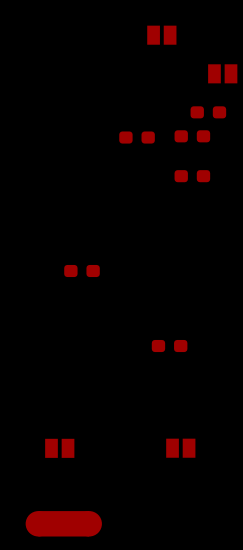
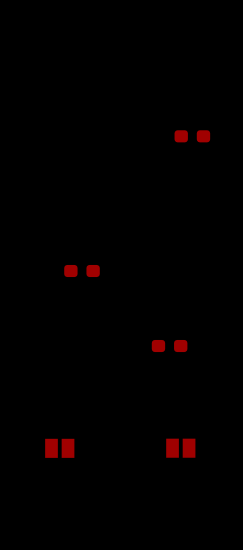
part: (161, 35) -> none
part: (222, 73) -> none
part: (208, 112) -> none
part: (137, 137) -> none
part: (192, 176) -> none
part: (63, 523) -> none

